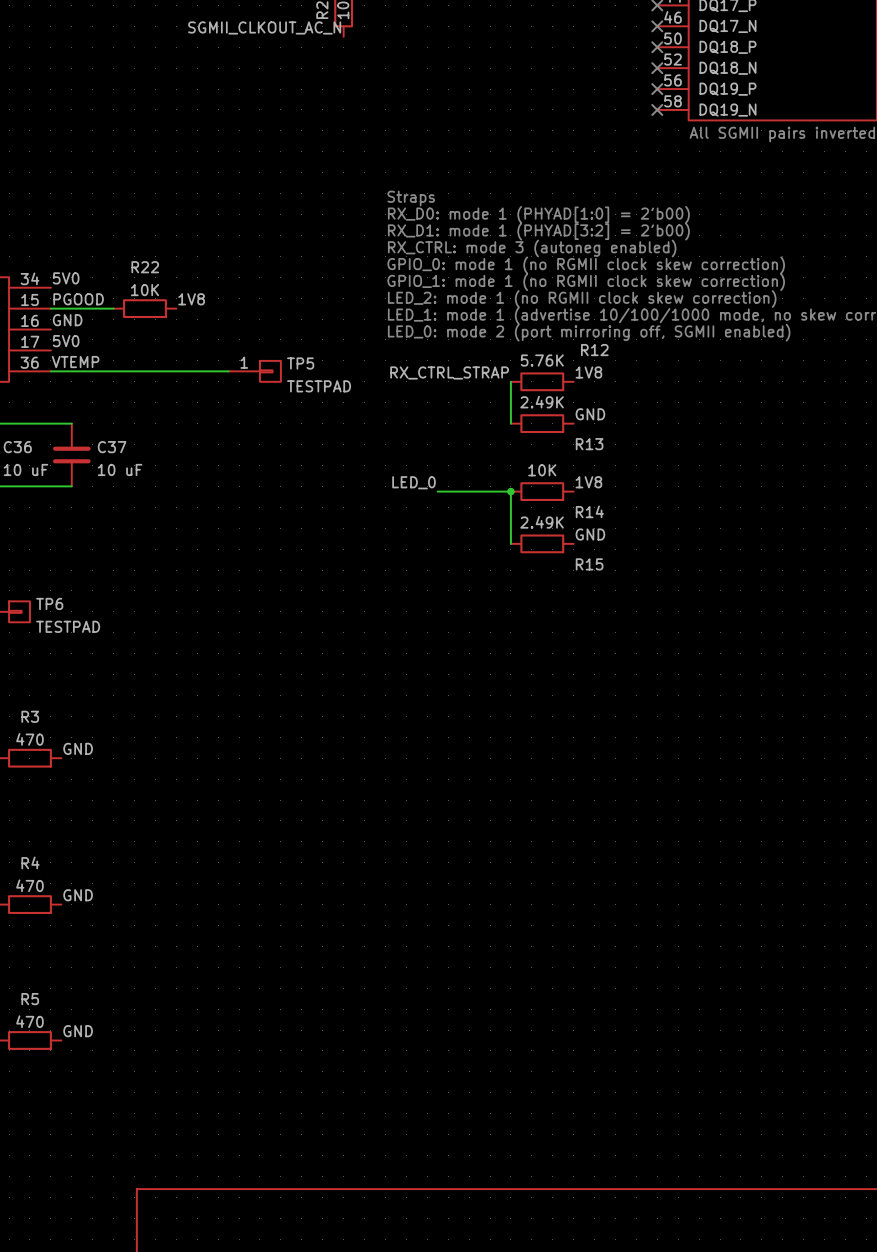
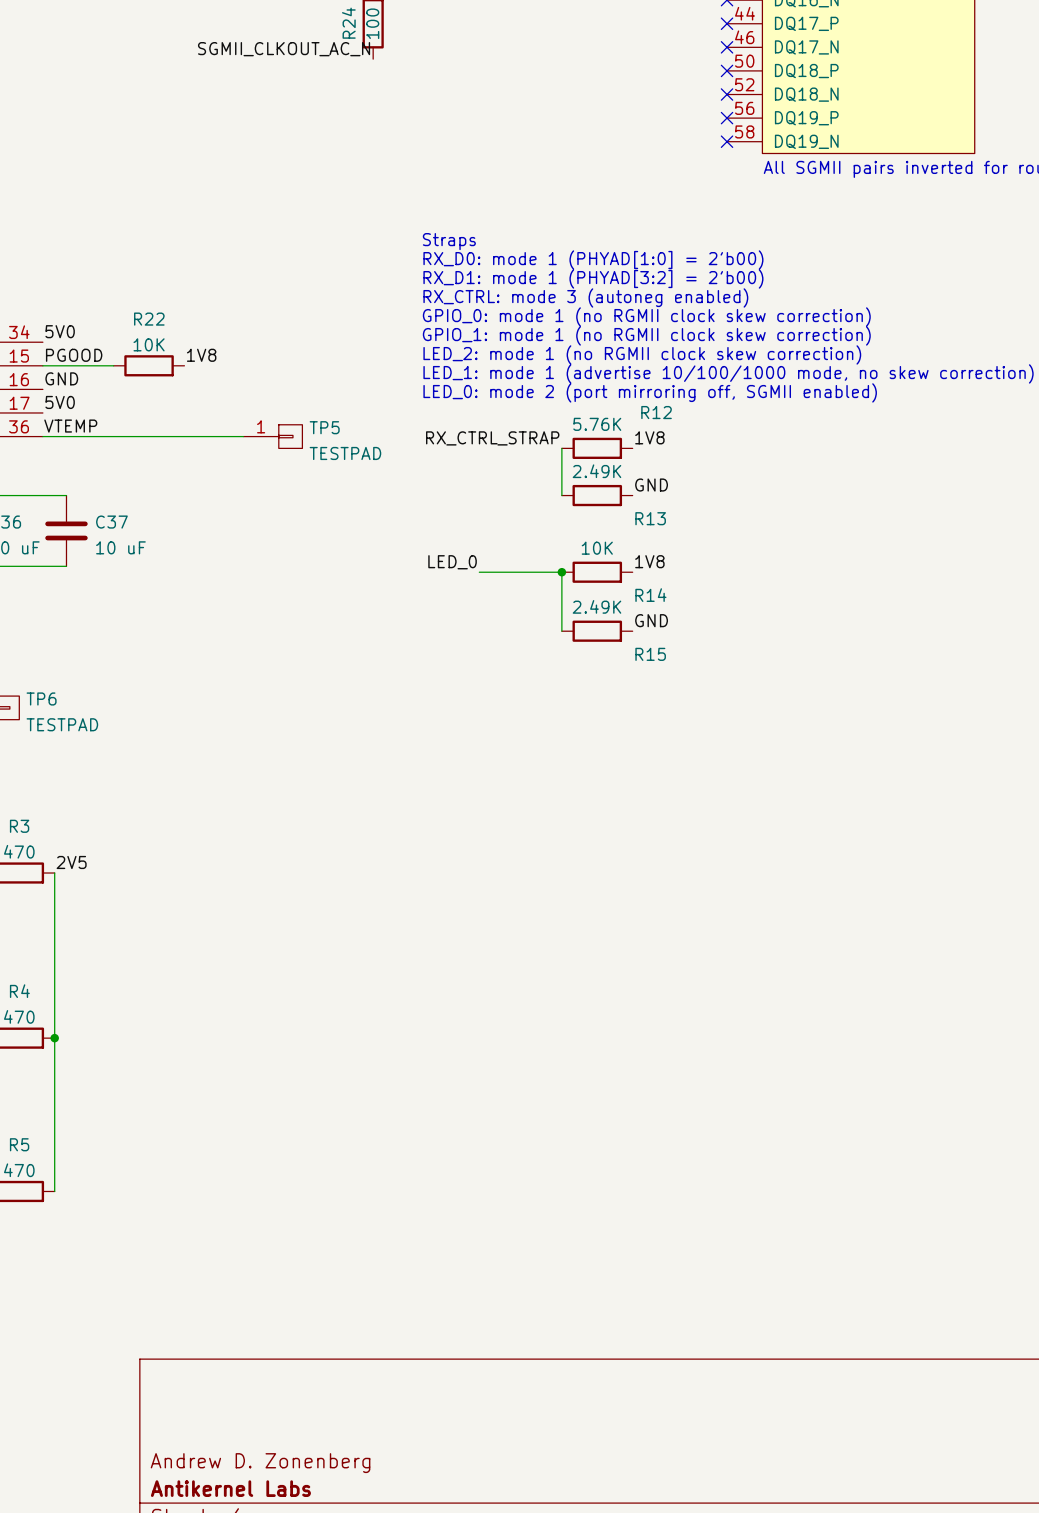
label: GND (78, 748) -> 2V5 (71, 862)
wire: none -> (54, 873) (54, 1191)
label: GND (78, 895) -> none
junction: none -> (54, 1038)
label: GND (78, 1031) -> none

